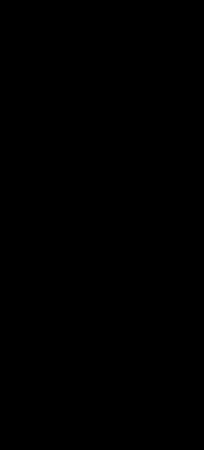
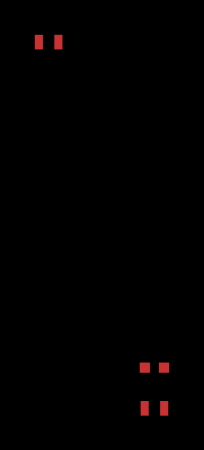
part: none -> (48, 42)
part: none -> (154, 367)
part: none -> (154, 408)

